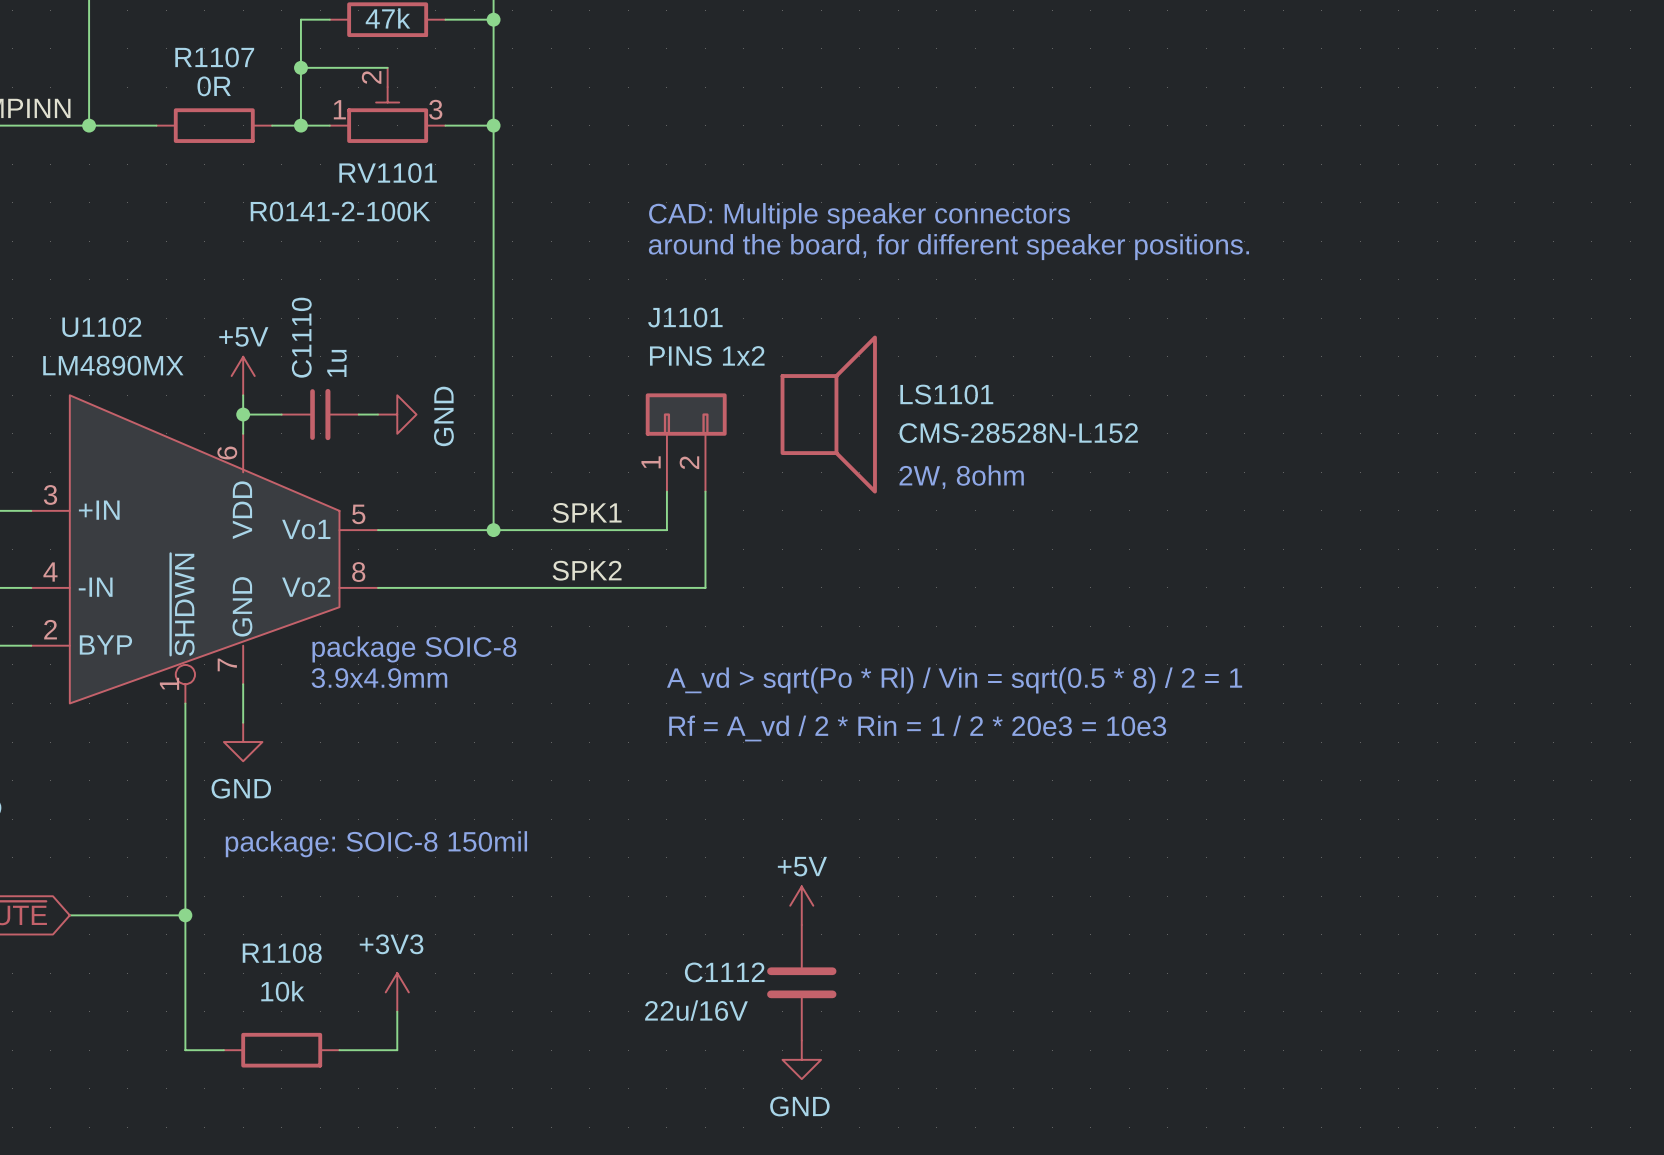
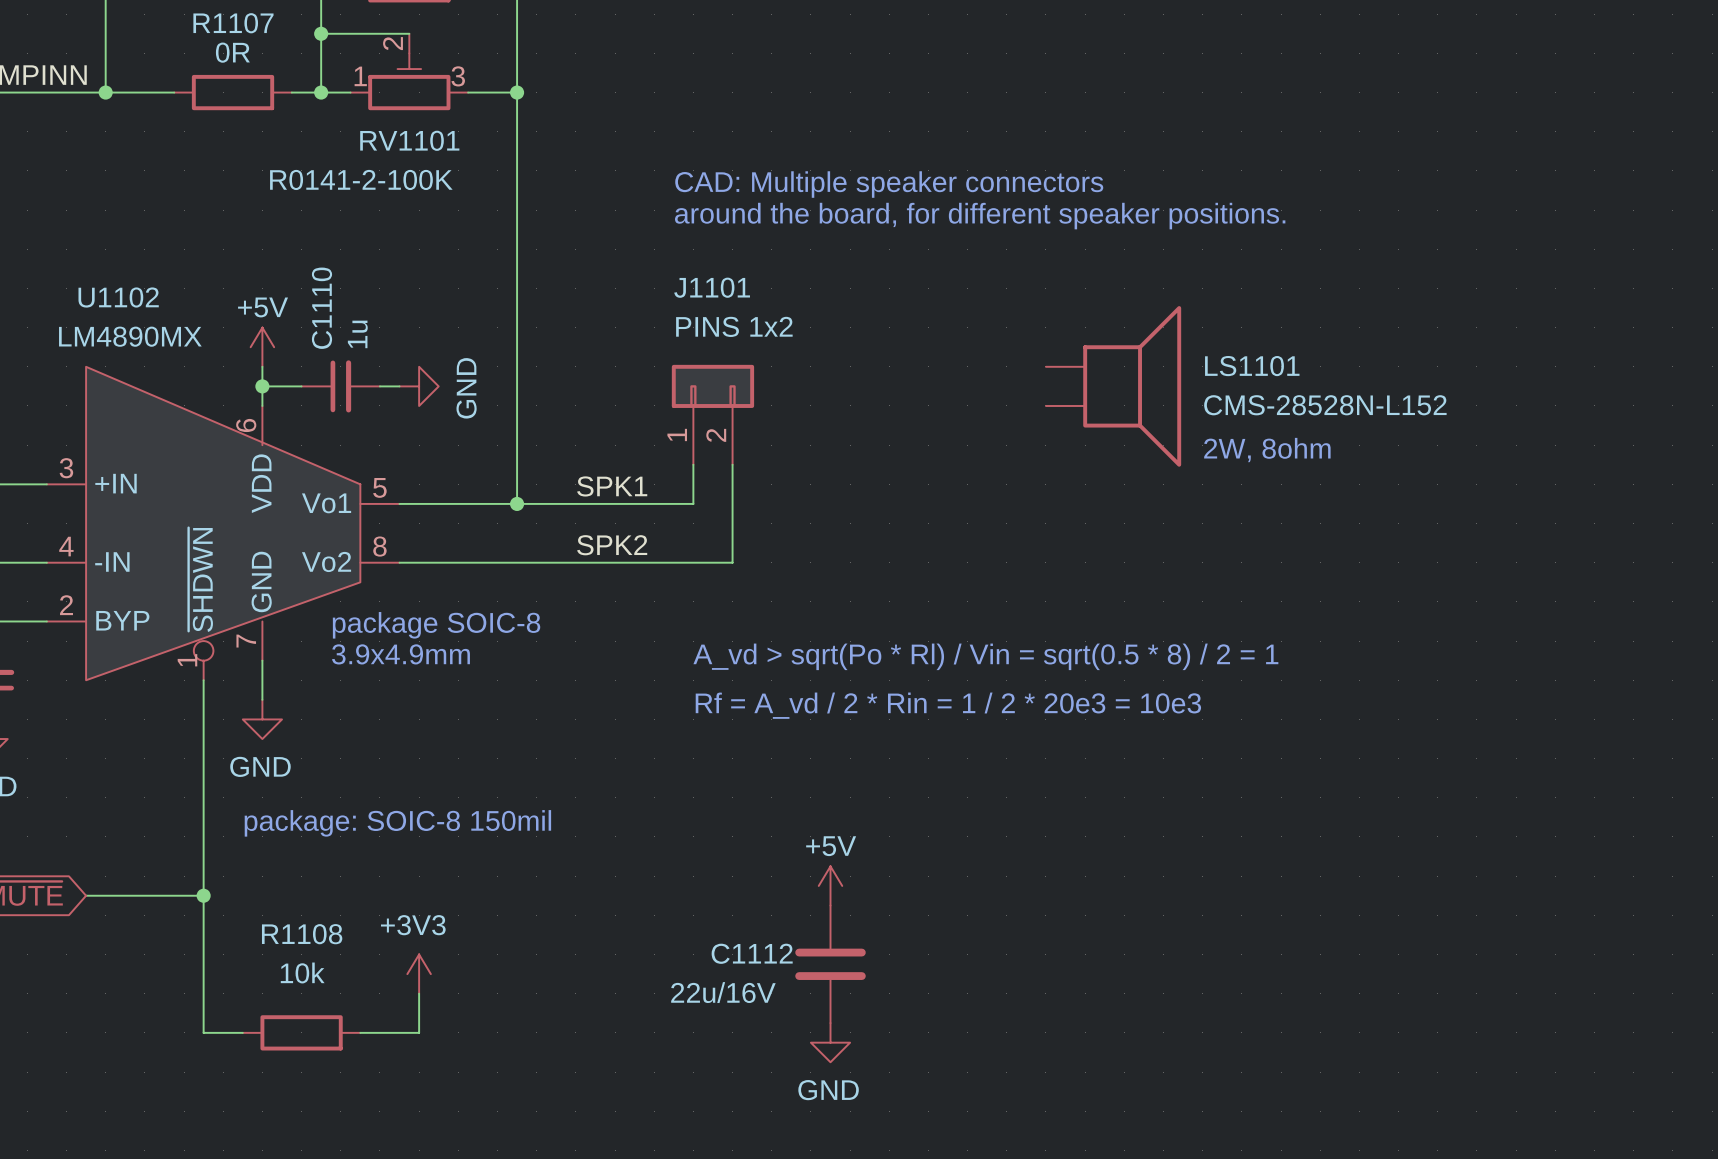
LS1101 symbol: [780, 335, 877, 494] -> [1045, 306, 1182, 467]
text position: 2W, 8ohm (961, 477) -> 2W, 8ohm (1267, 450)

